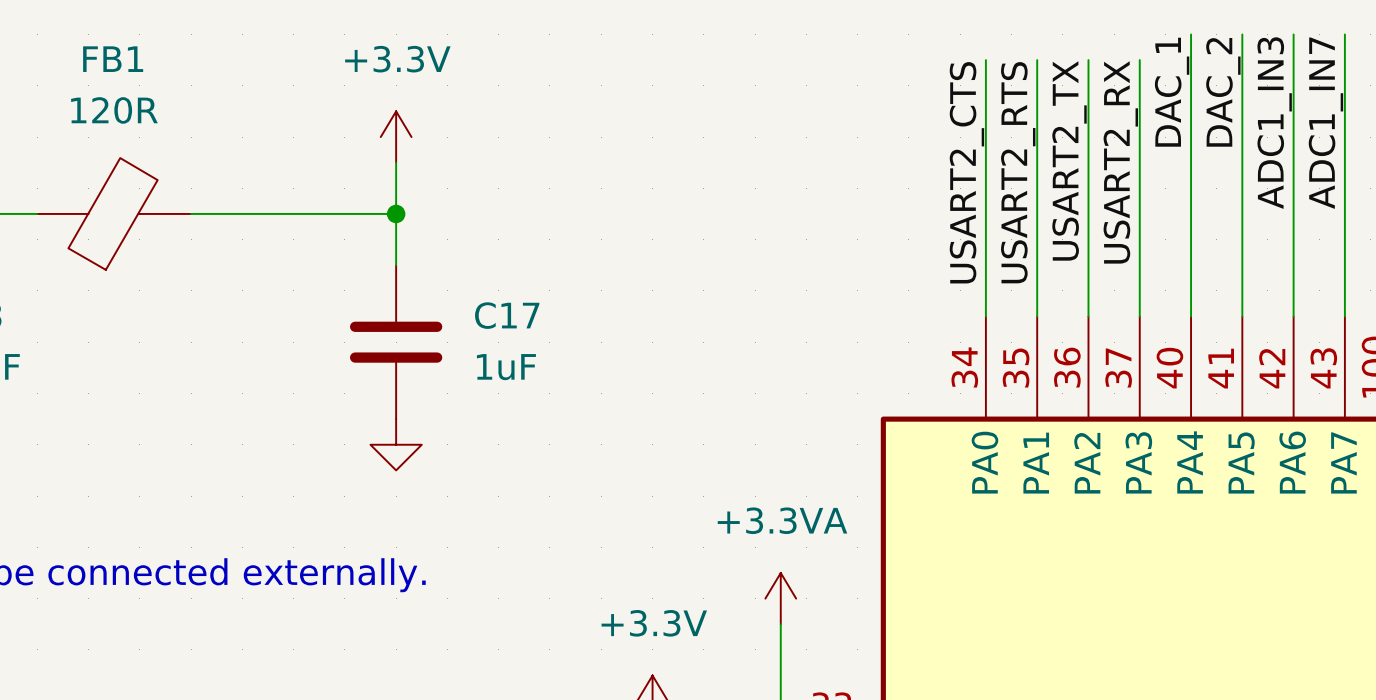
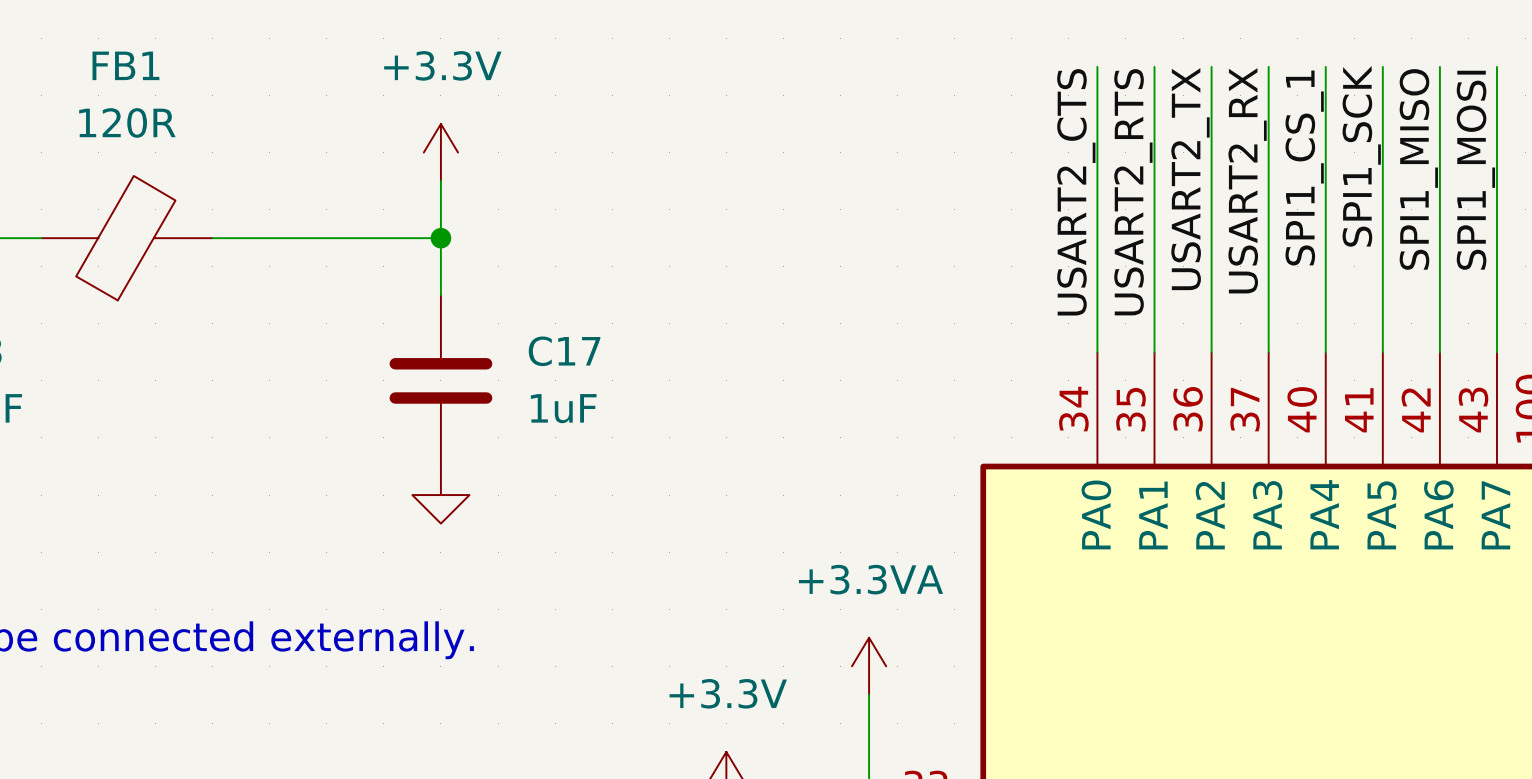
wire: (1191, 34) (1191, 60) -> none
wire: (1242, 34) (1242, 60) -> none
wire: (1293, 34) (1293, 60) -> none
wire: (1344, 34) (1344, 60) -> none
label: DAC_1 (1172, 92) -> none
label: DAC_2 (1223, 92) -> none
label: ADC1_IN3 (1274, 123) -> none
label: ADC1_IN7 (1325, 123) -> none
label: none -> SPI1_SCK (1361, 156)
label: none -> SPI1_CS_1 (1304, 168)
label: none -> SPI1_MISO (1418, 169)
label: none -> SPI1_MOSI (1475, 170)

